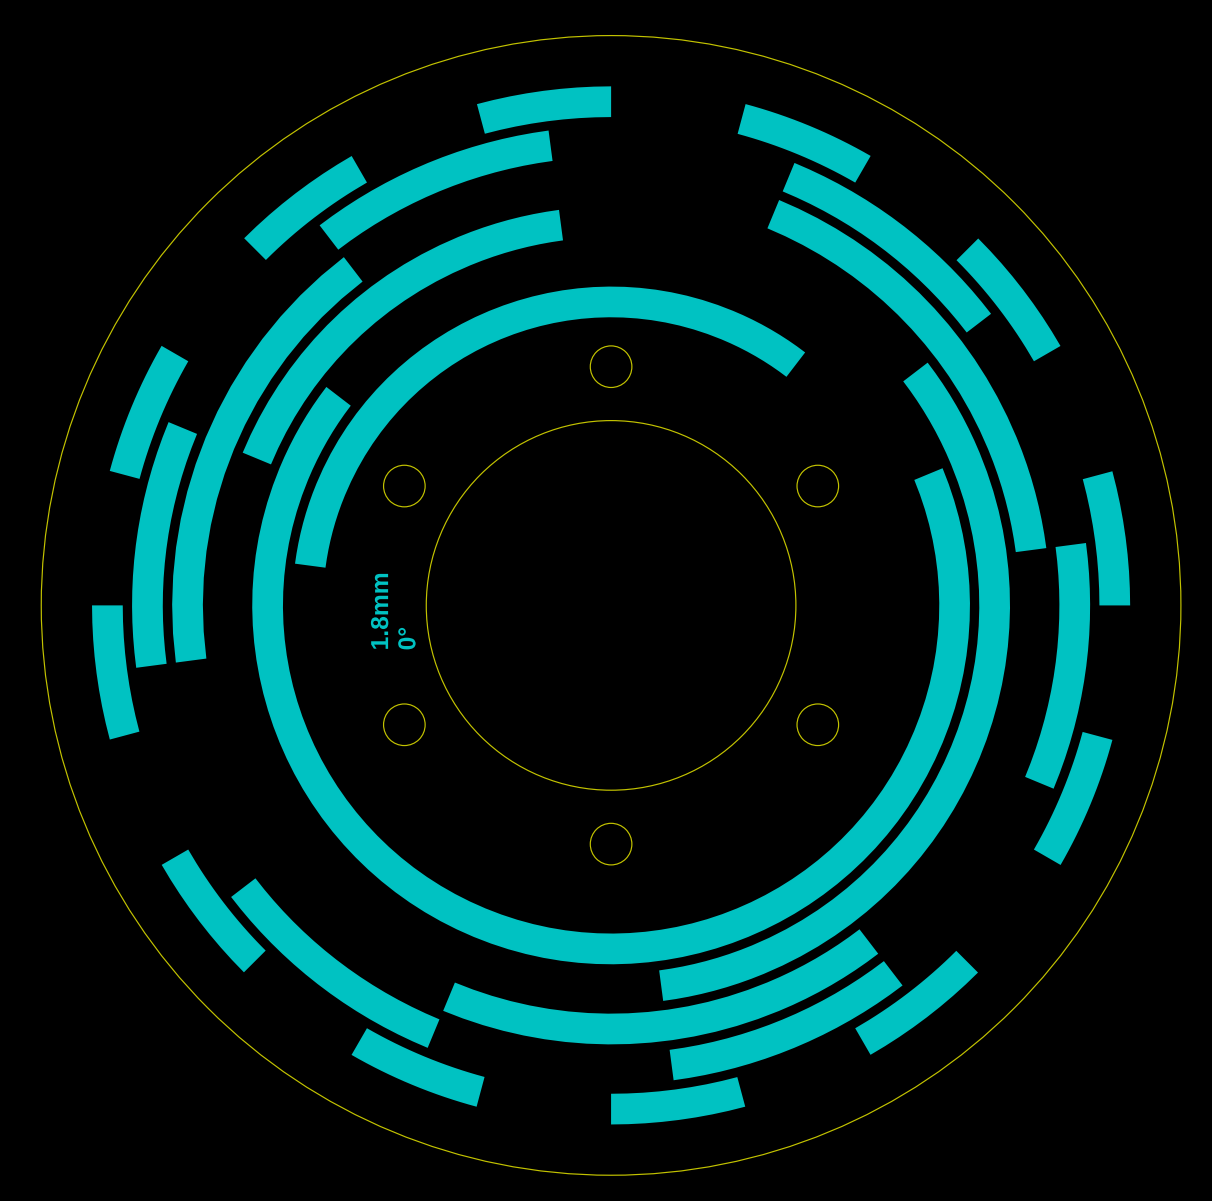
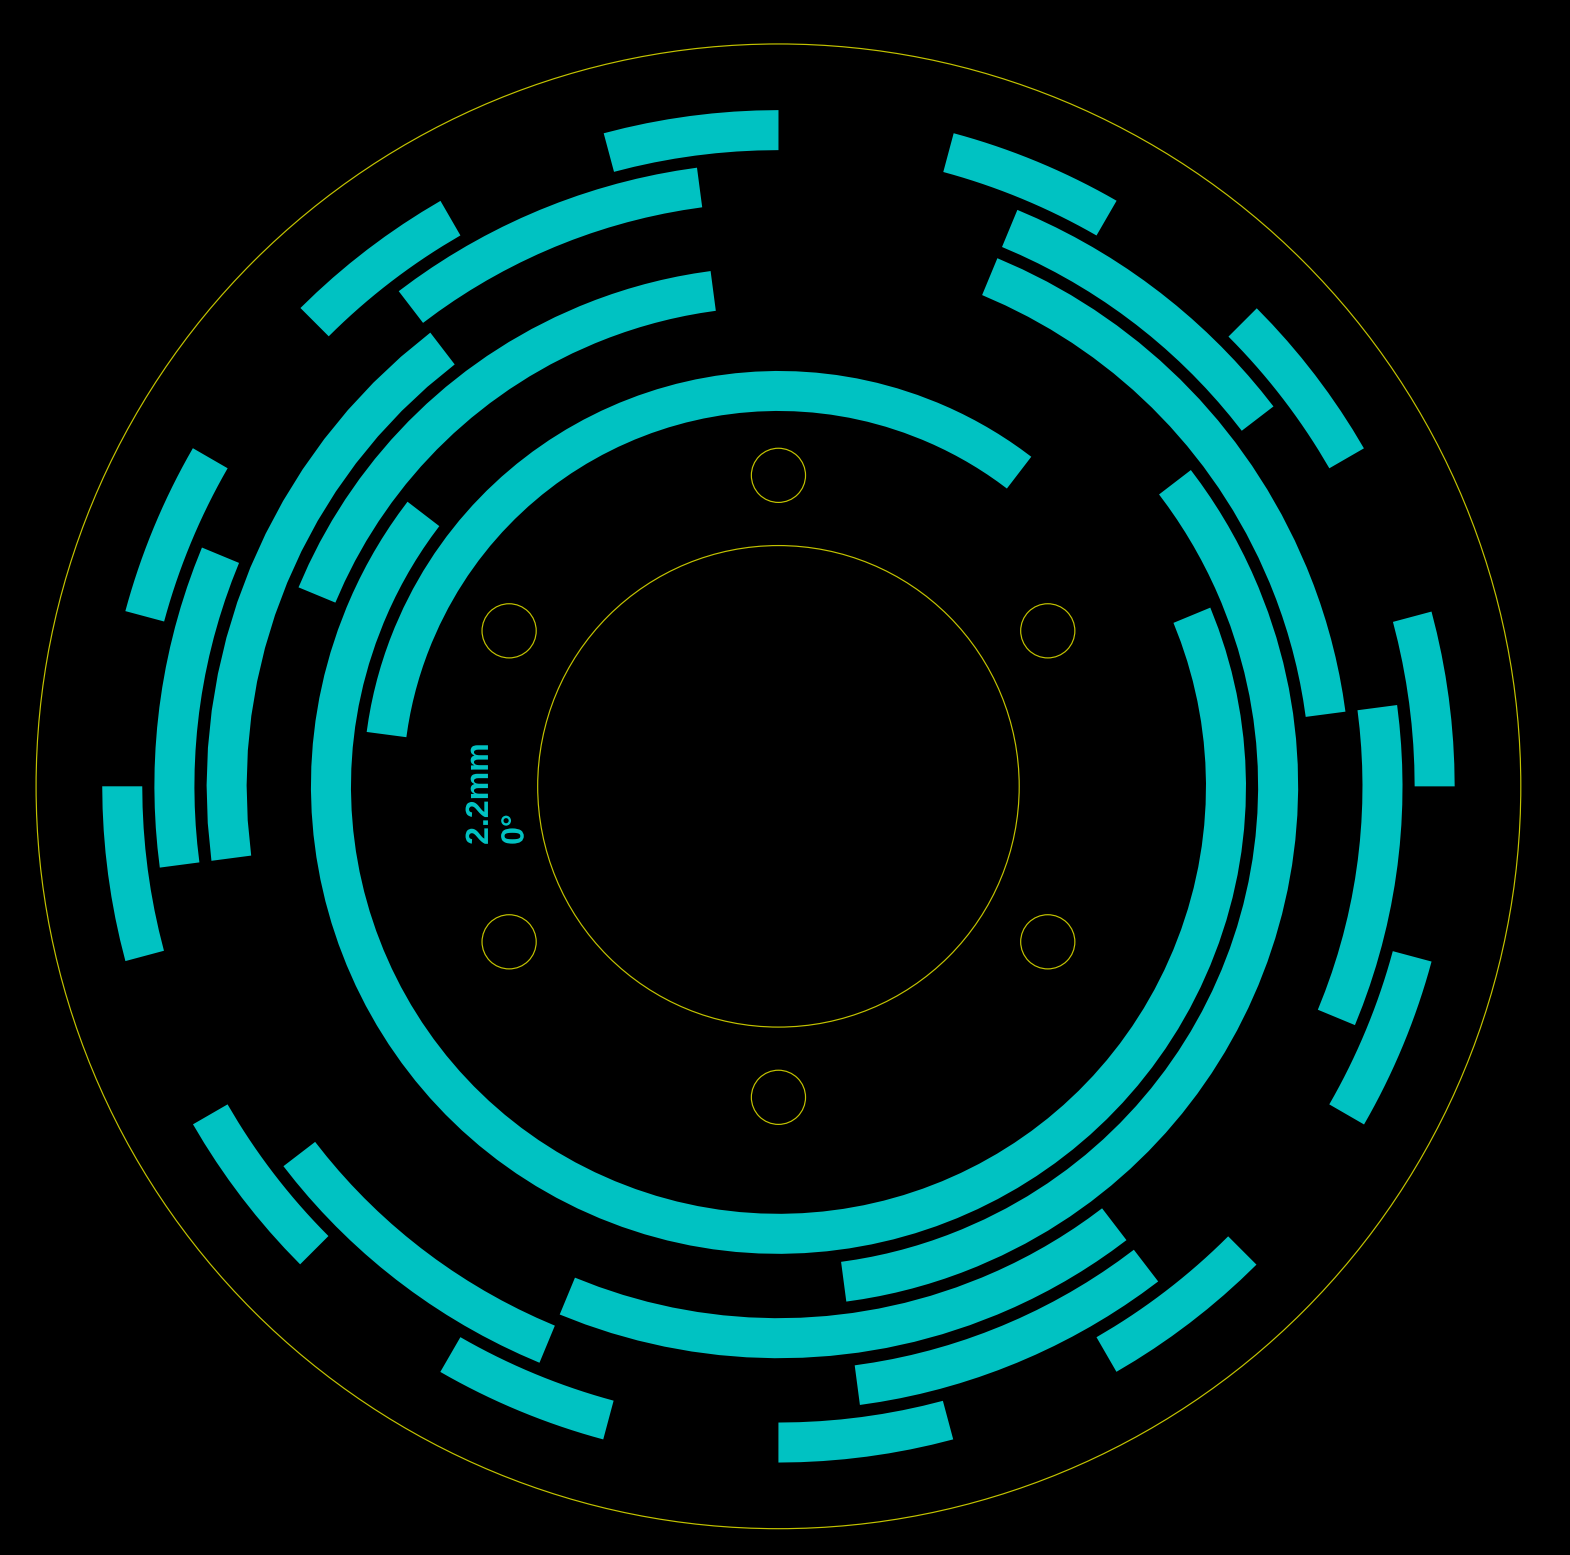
text: 1.8mm (379, 611) -> 2.2mm (476, 794)

